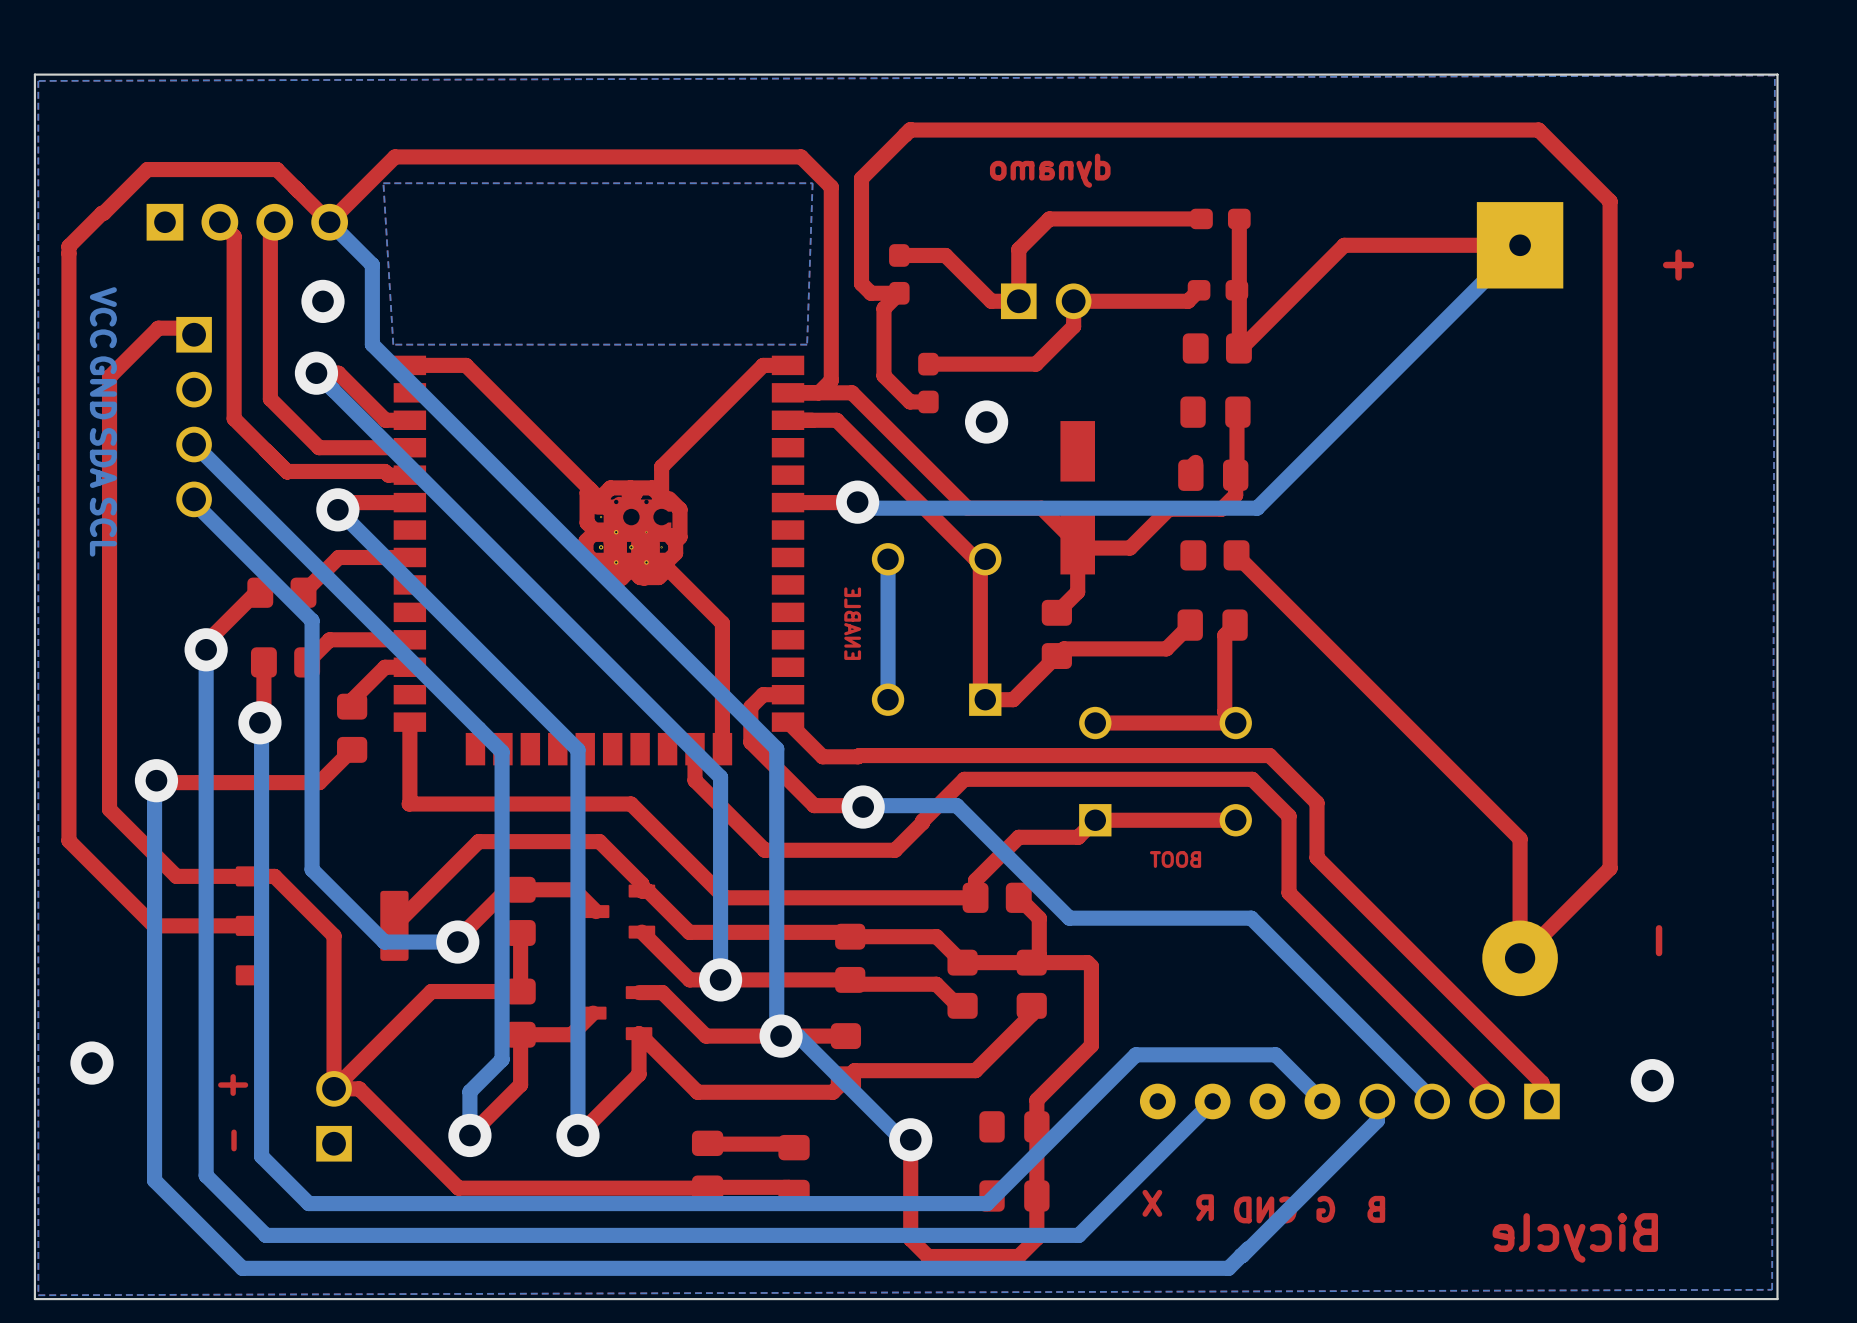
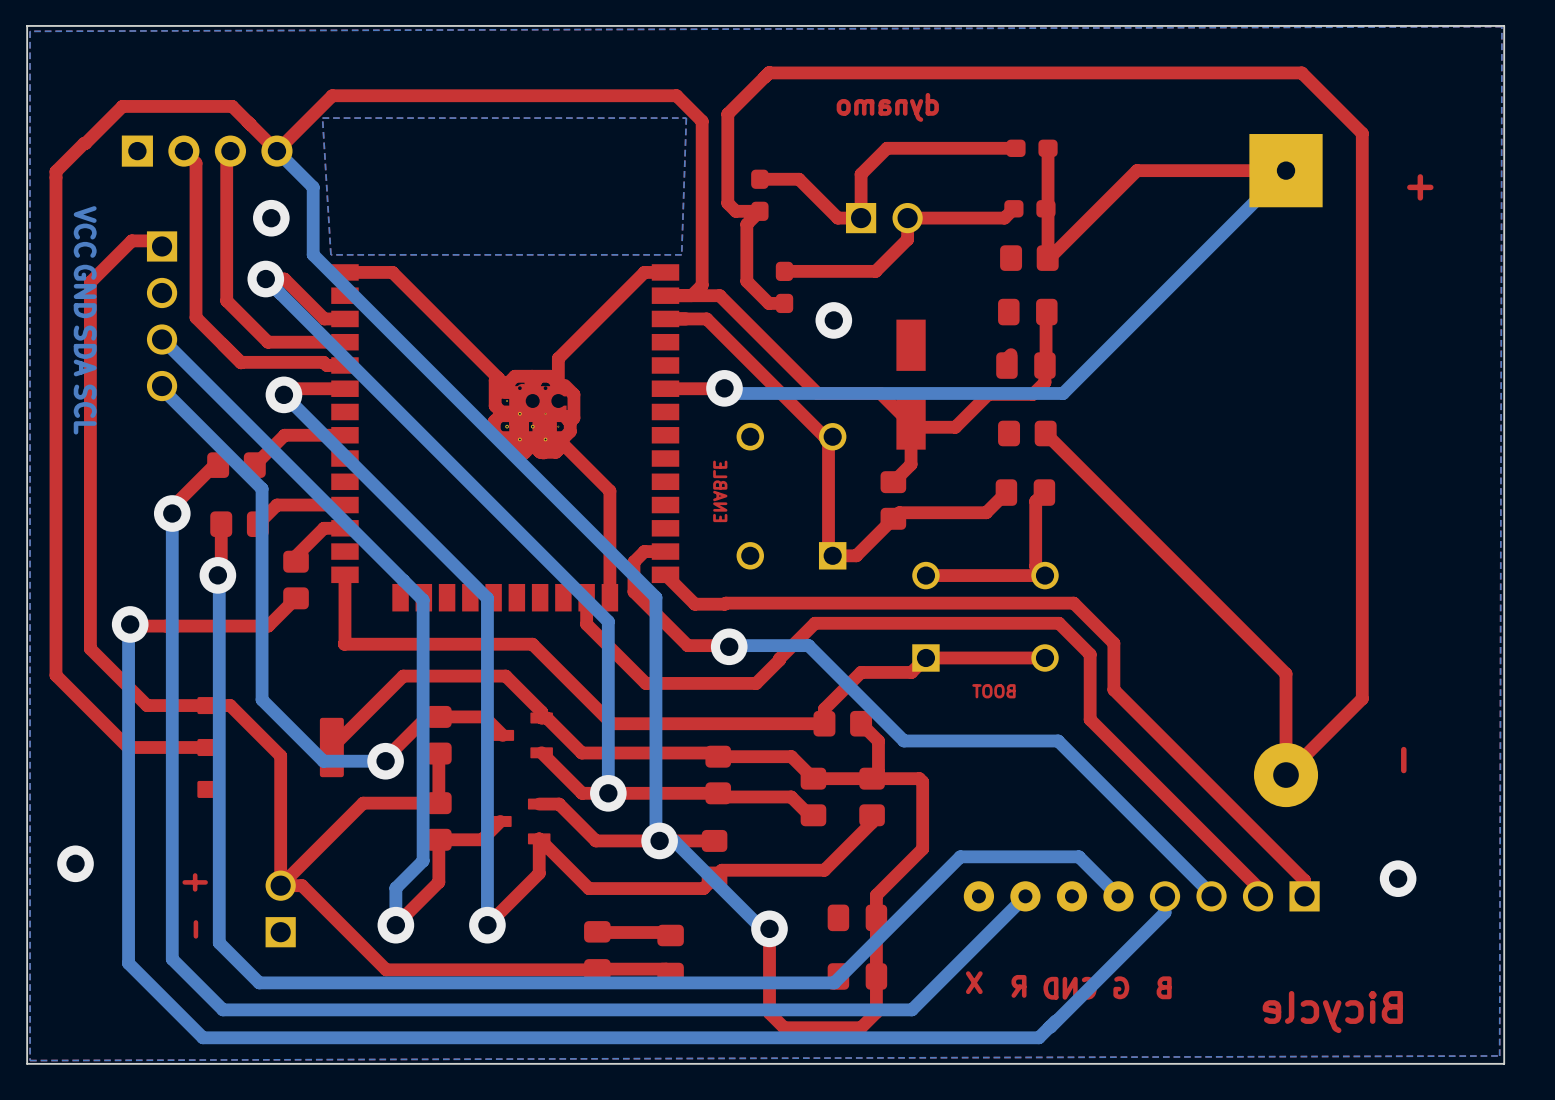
bottom track: (888, 559) (888, 699) -> none

